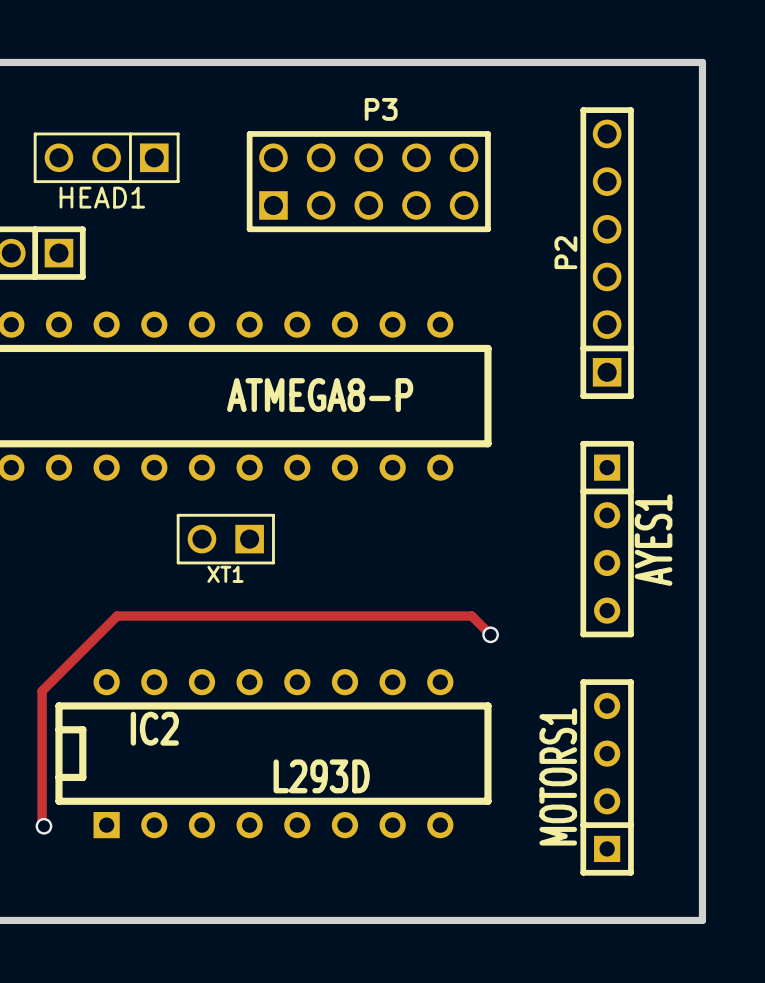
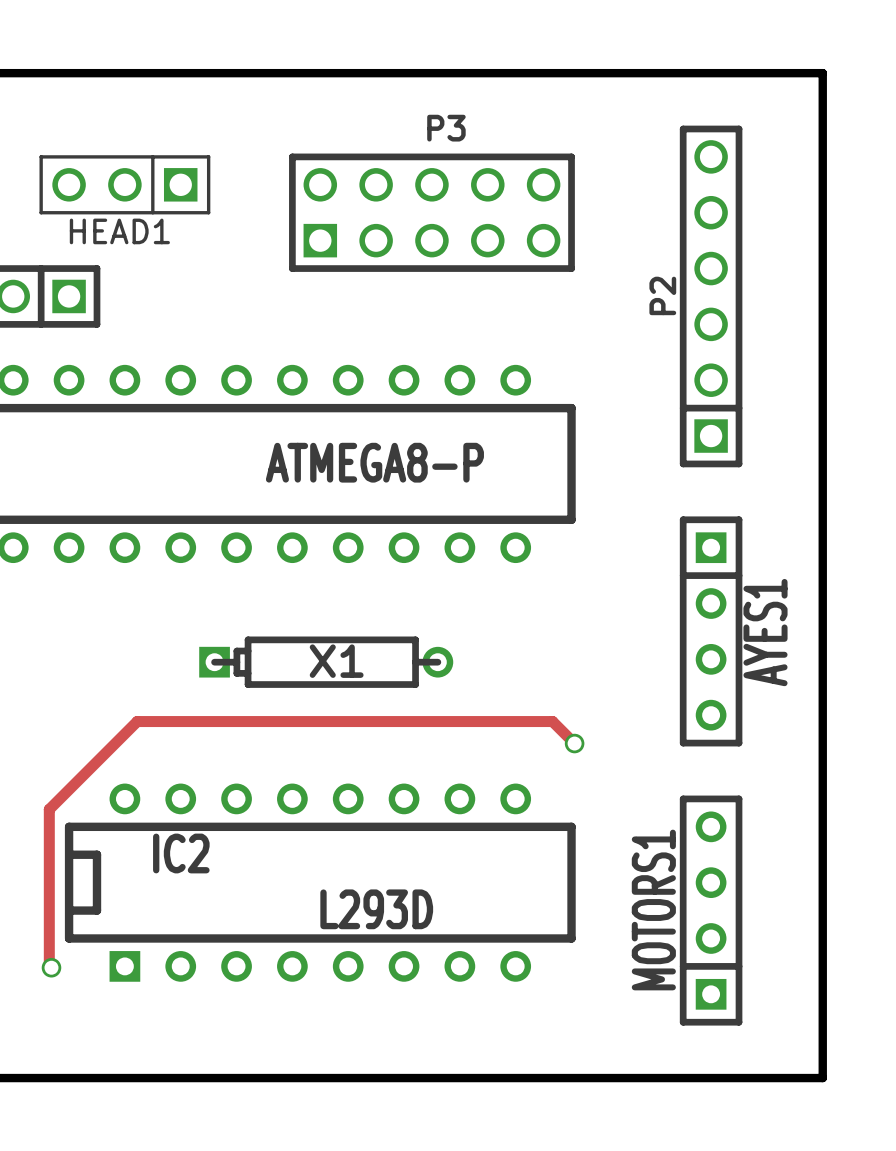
XT1: (225, 539) -> none
X1: none -> (326, 662)

